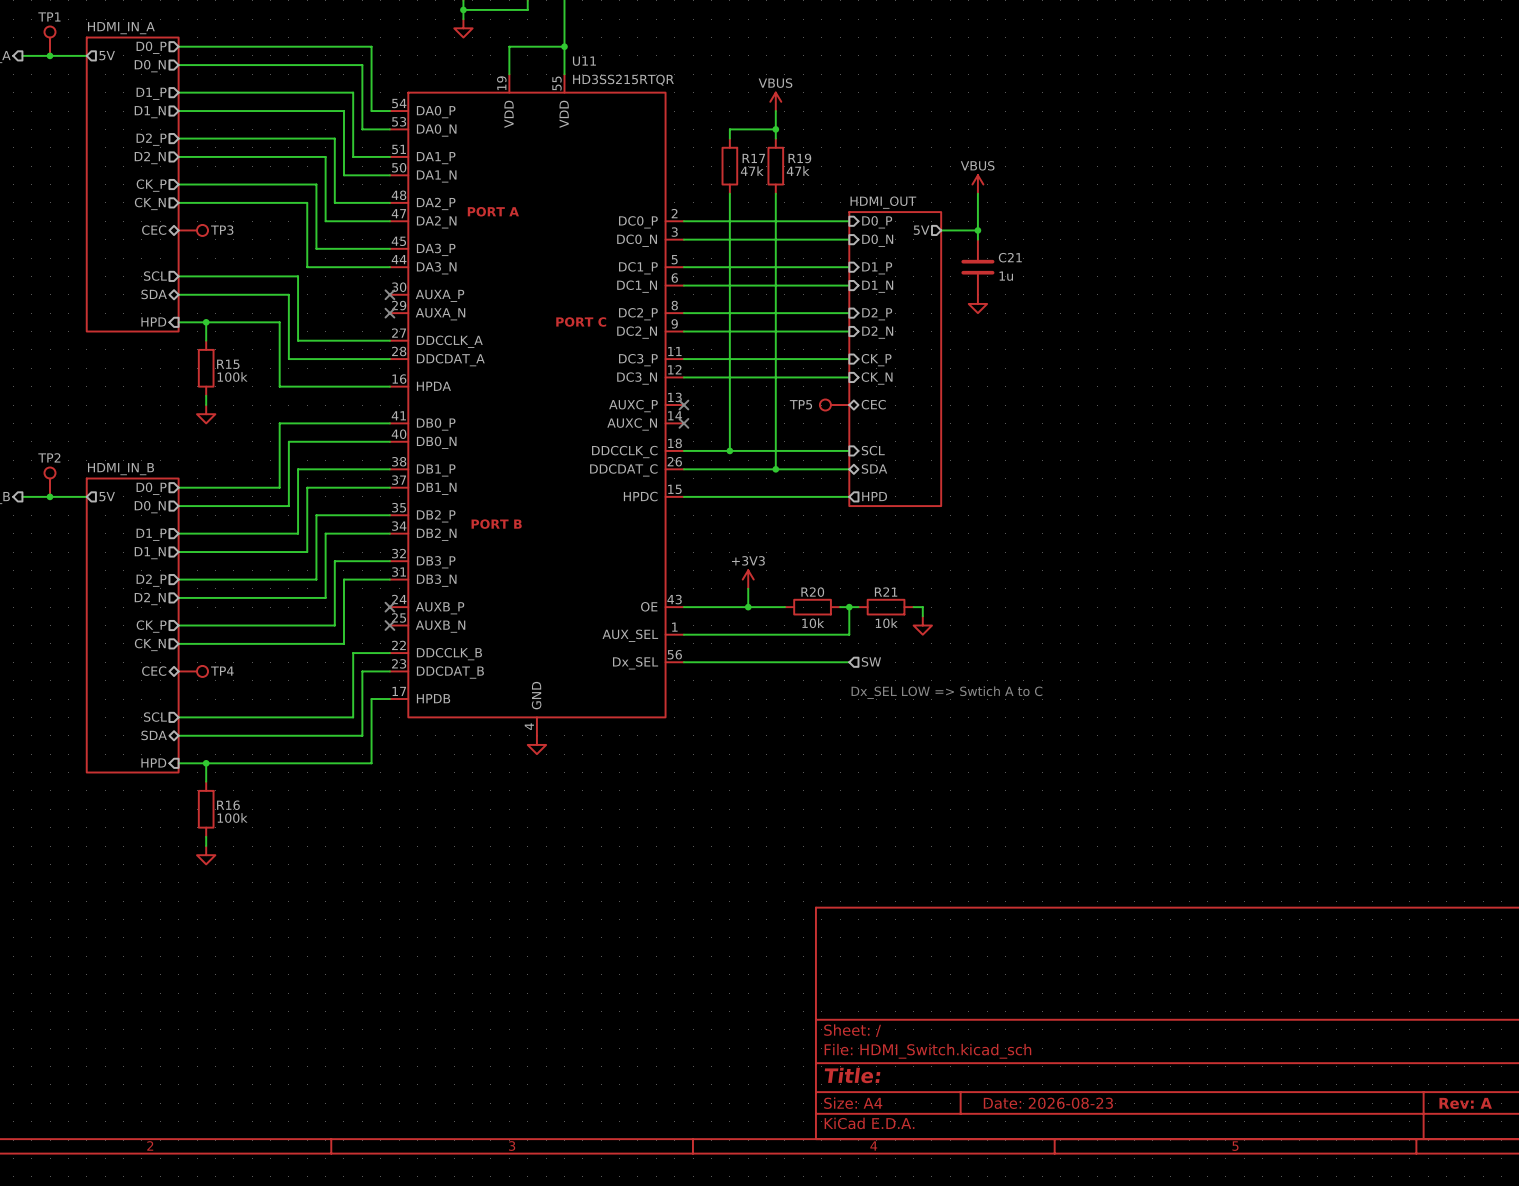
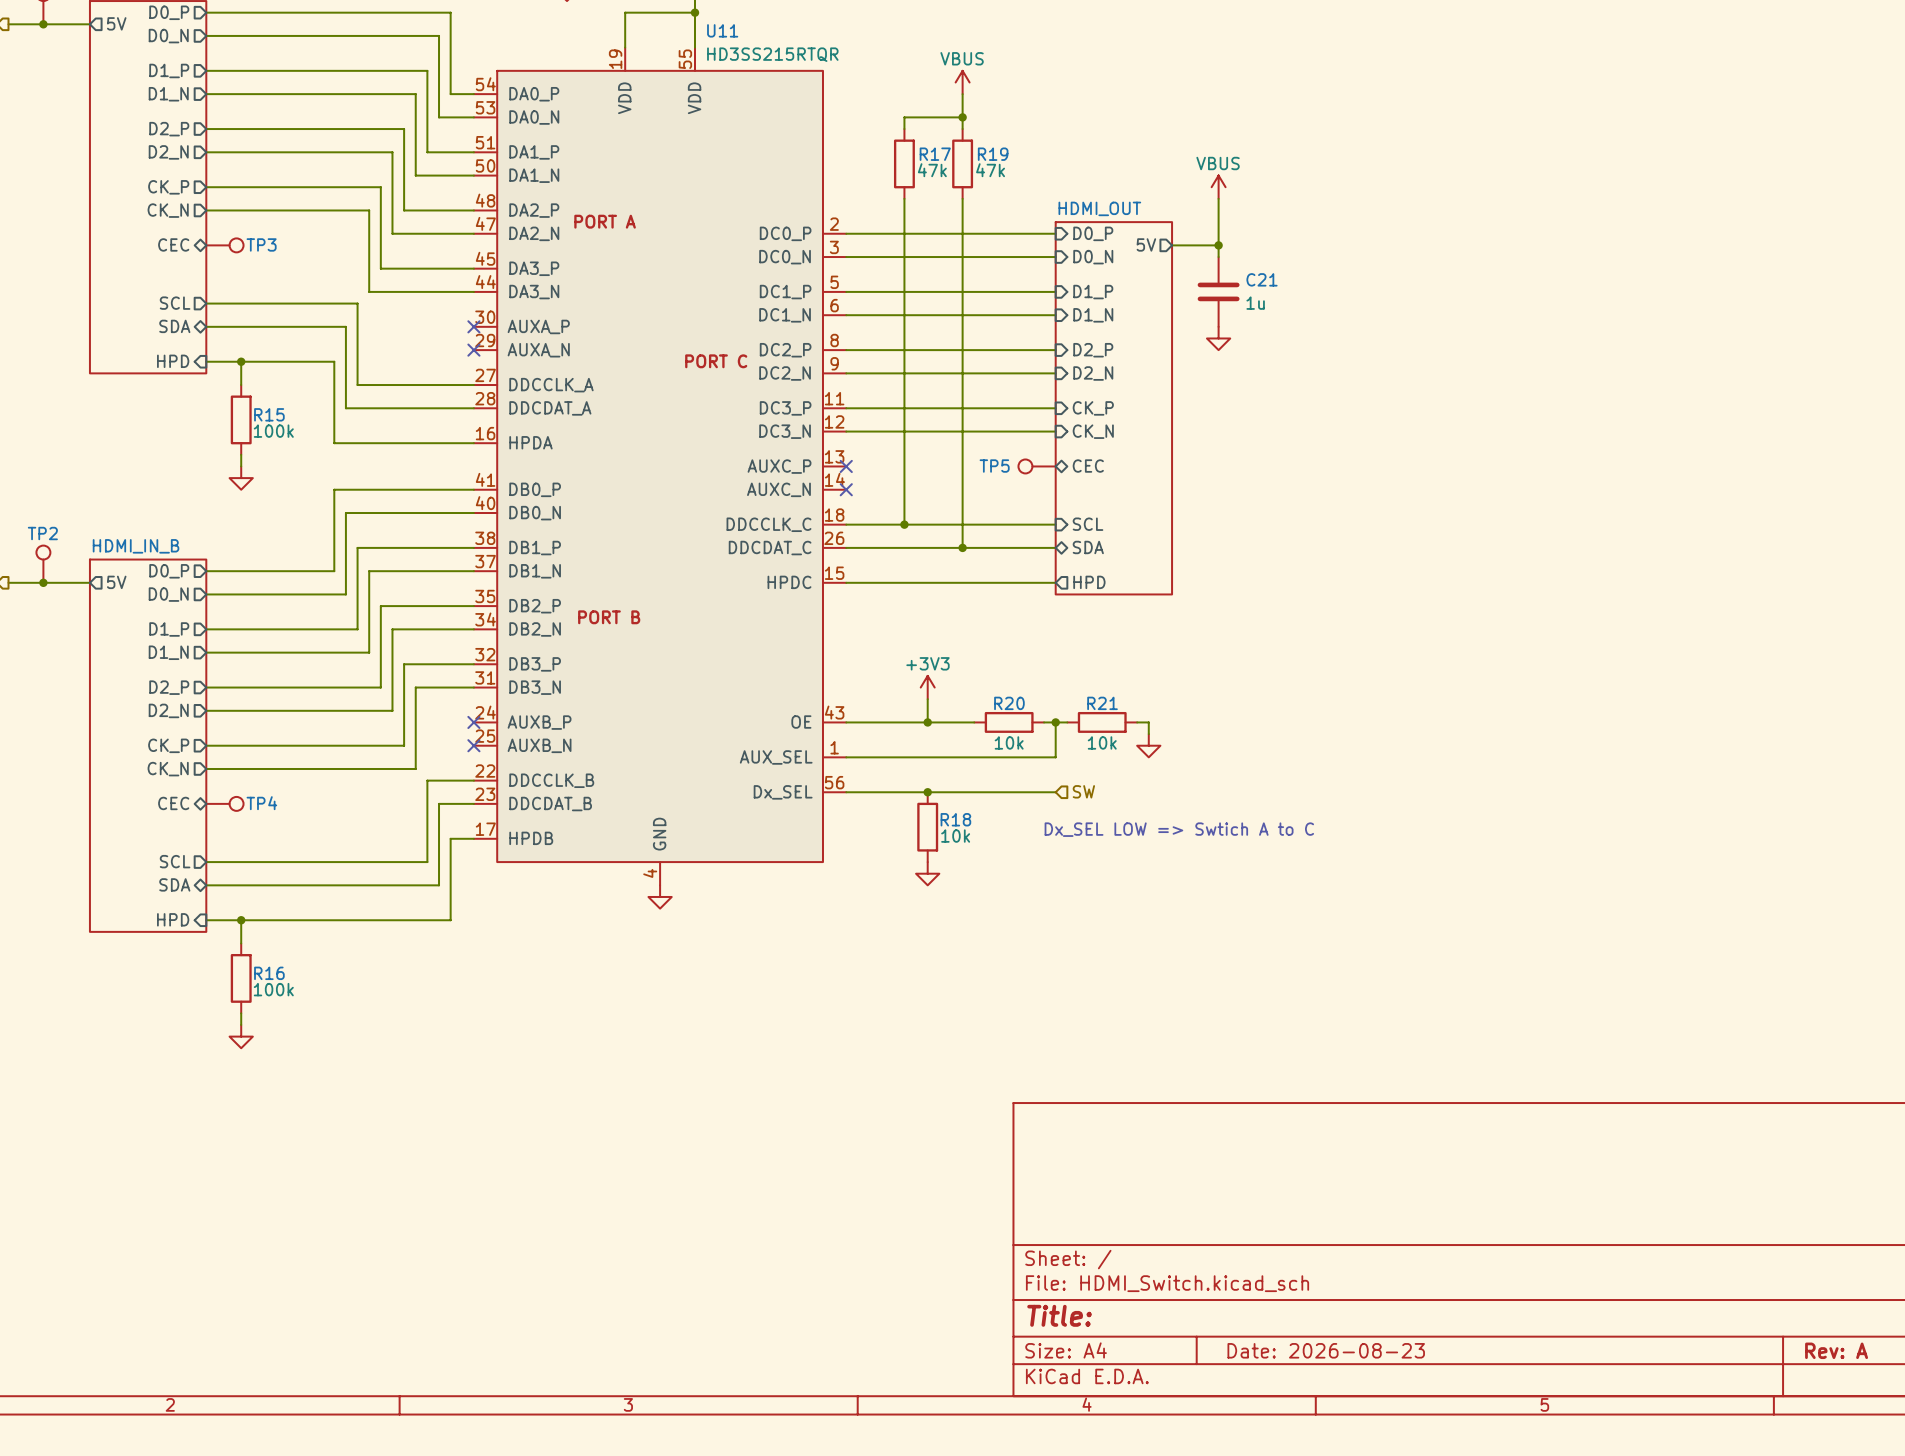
junction: none -> (927, 792)
R18: none -> 10k (927, 827)
power symbol: none -> (927, 873)

